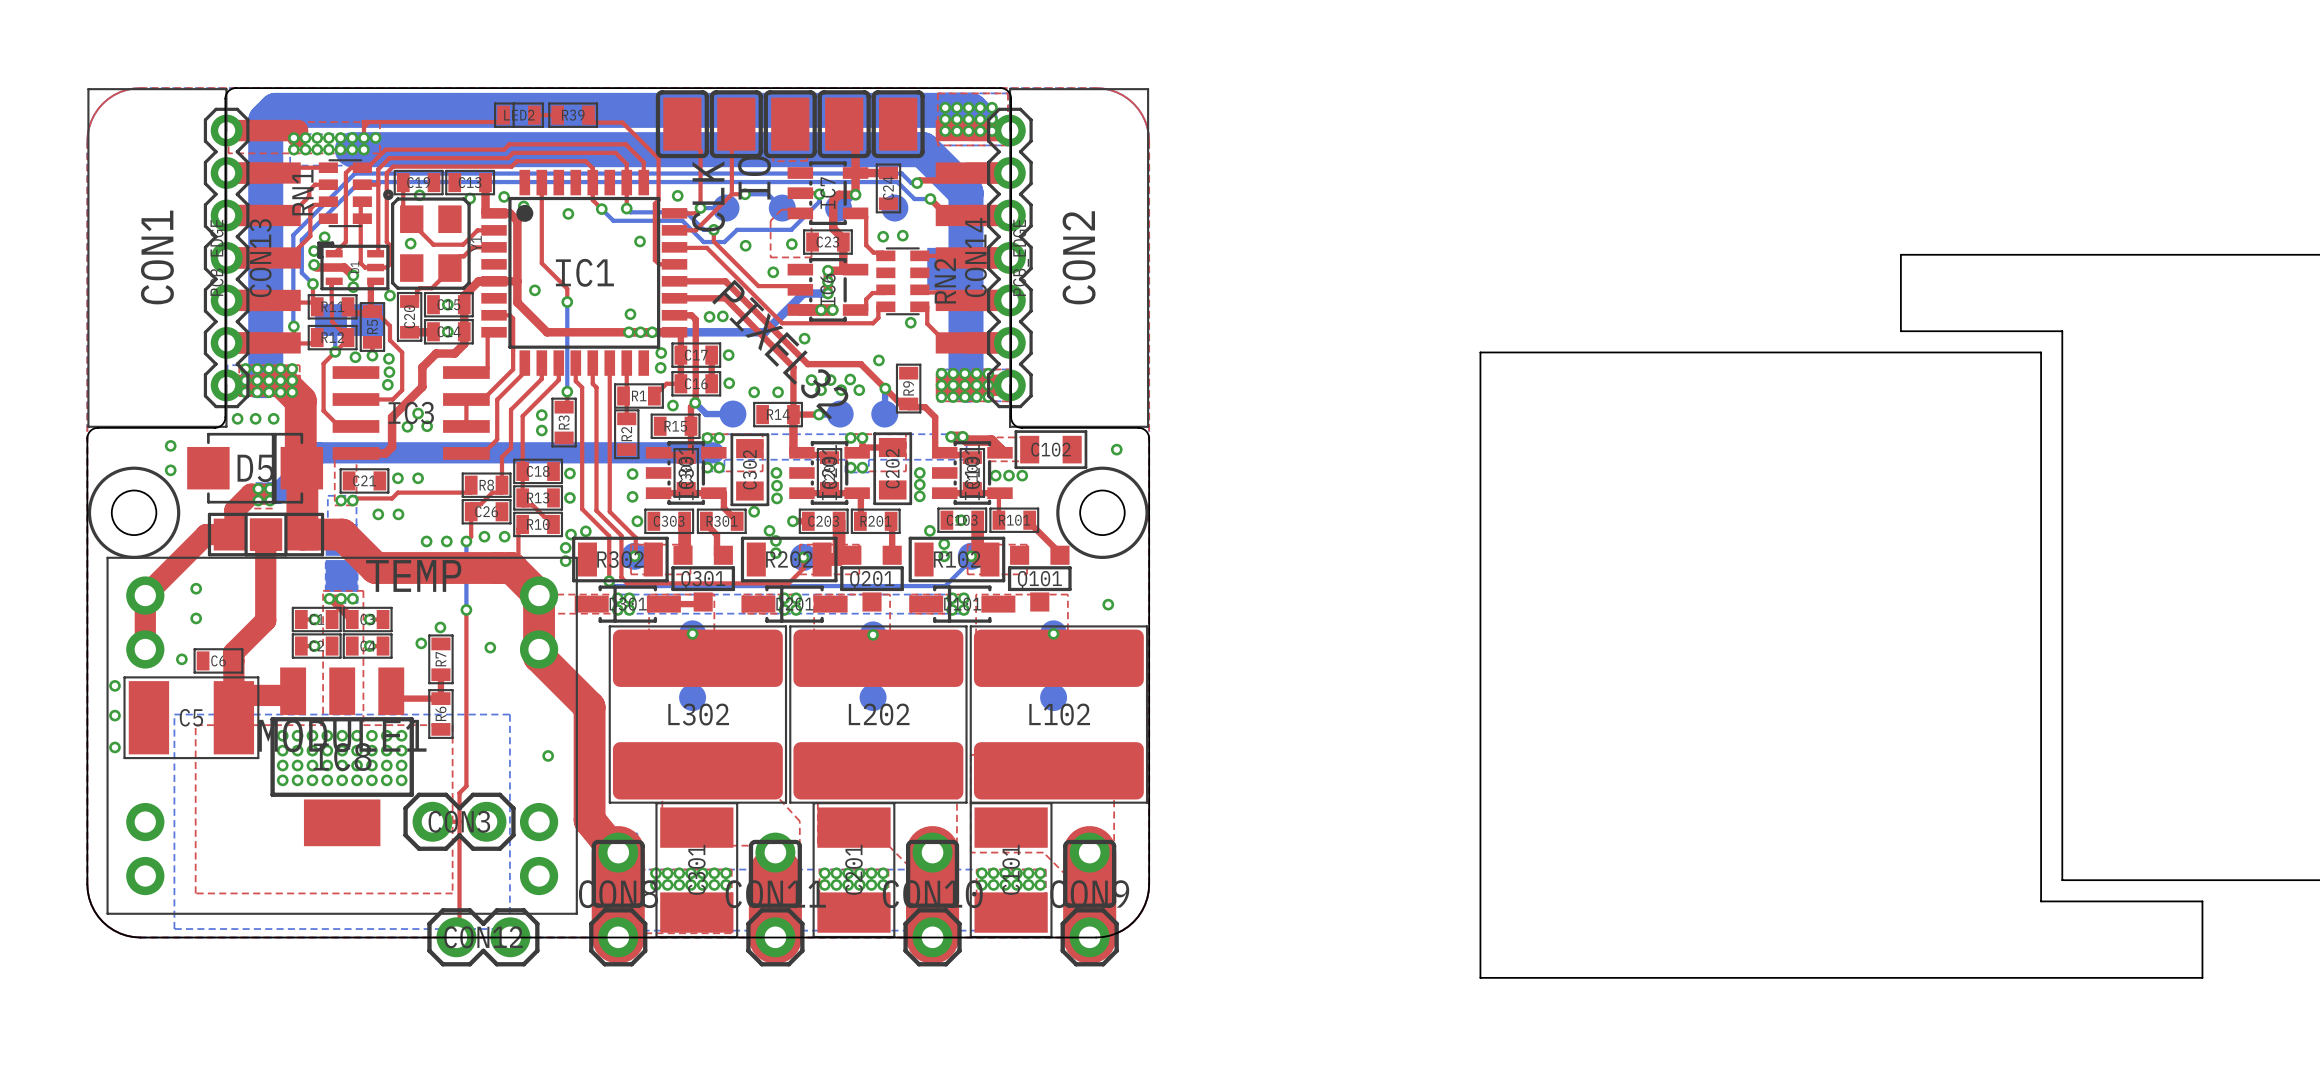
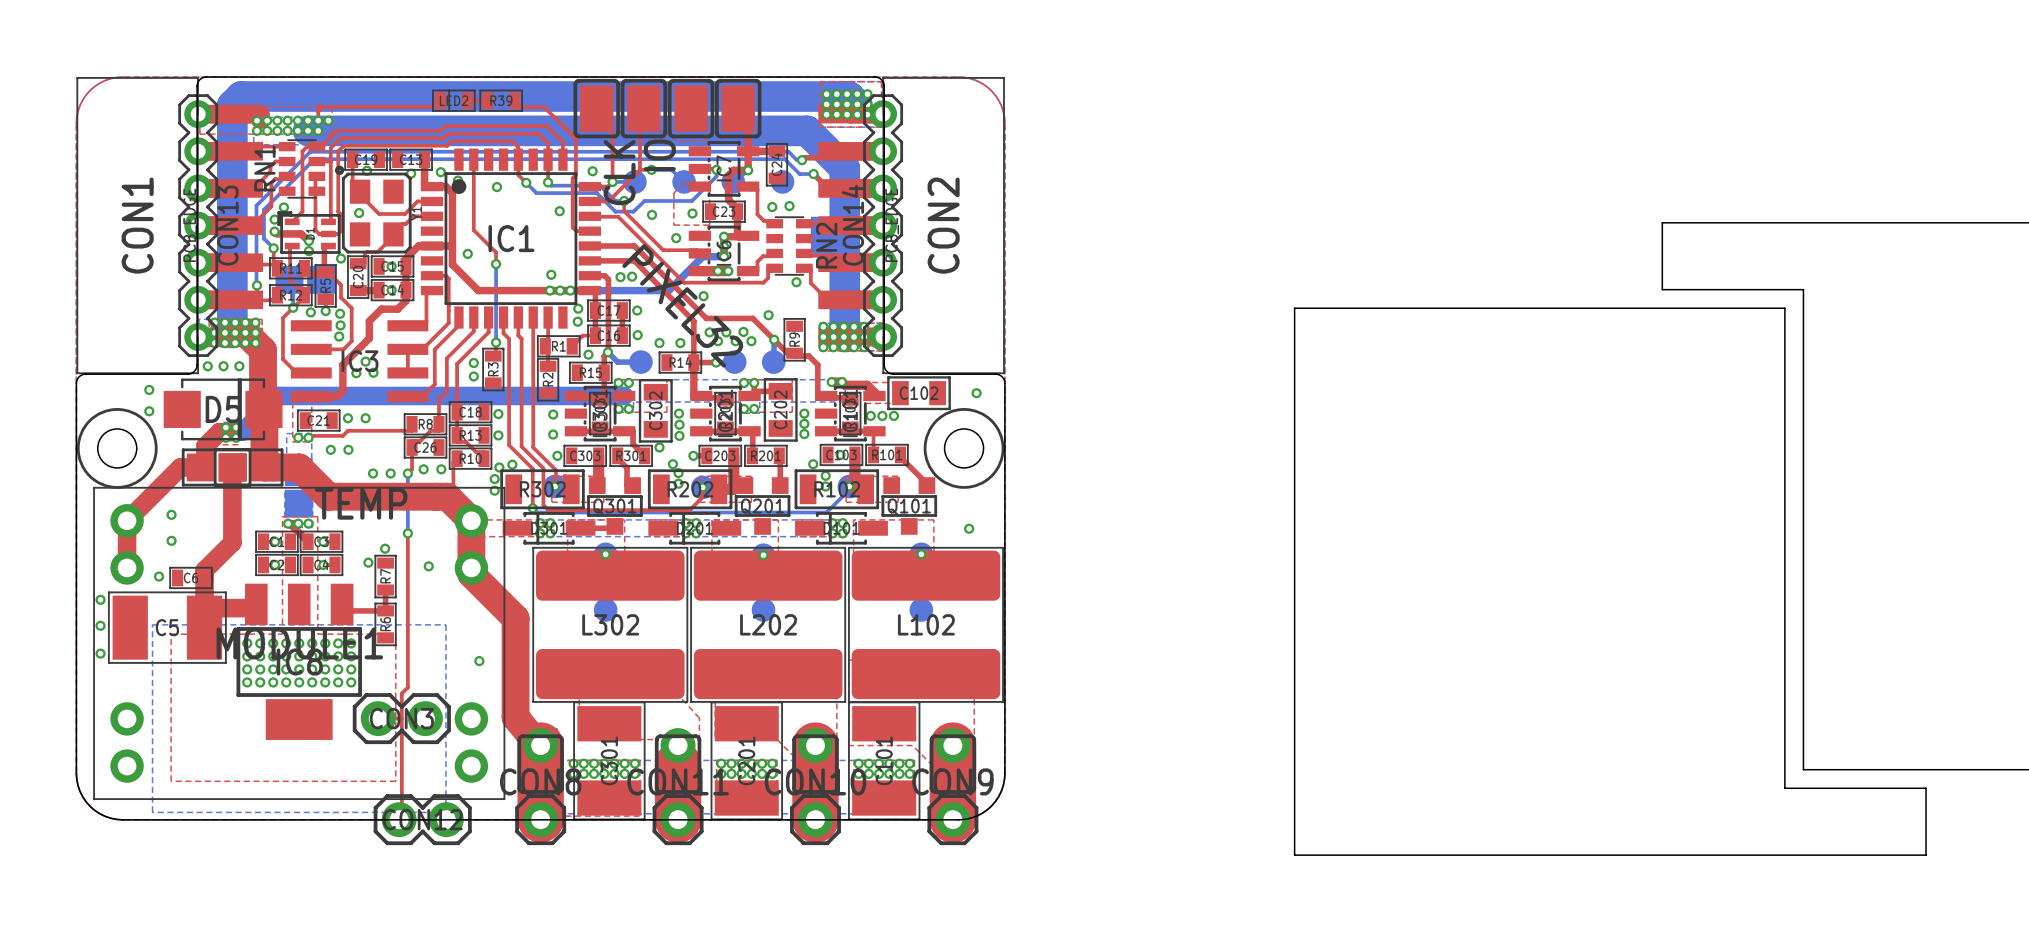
part: (898, 124) -> none

